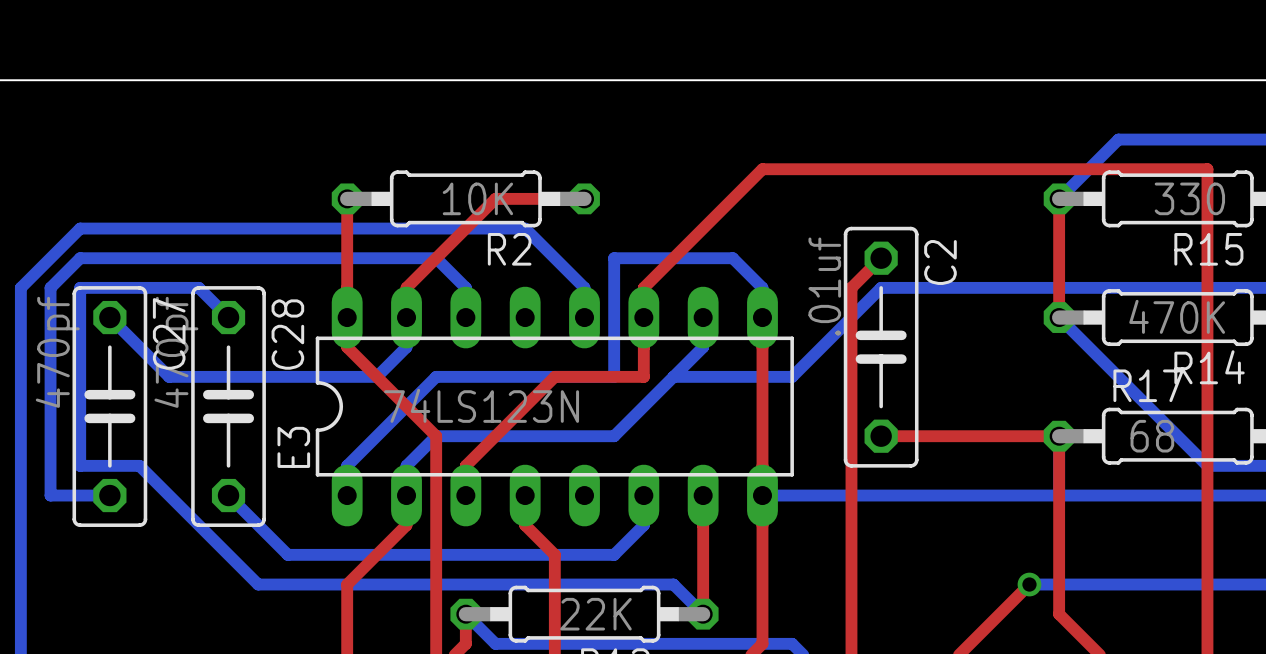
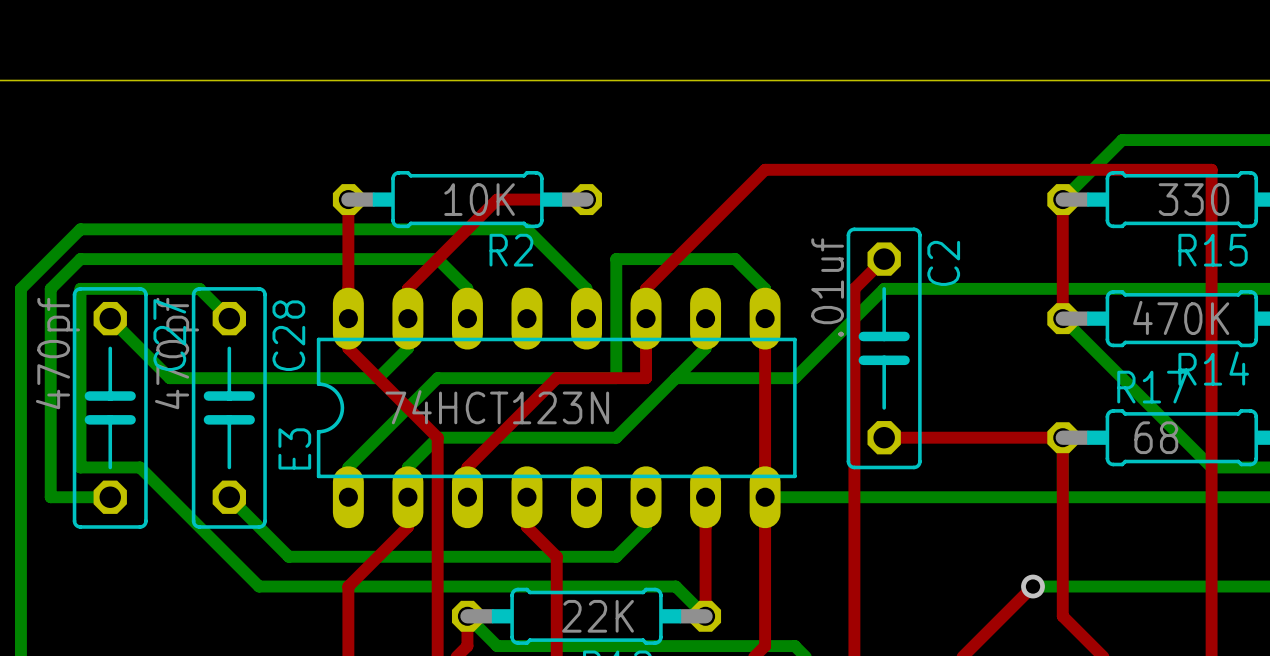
E3 value: 74LS123N (481, 405) -> 74HCT123N (497, 407)

